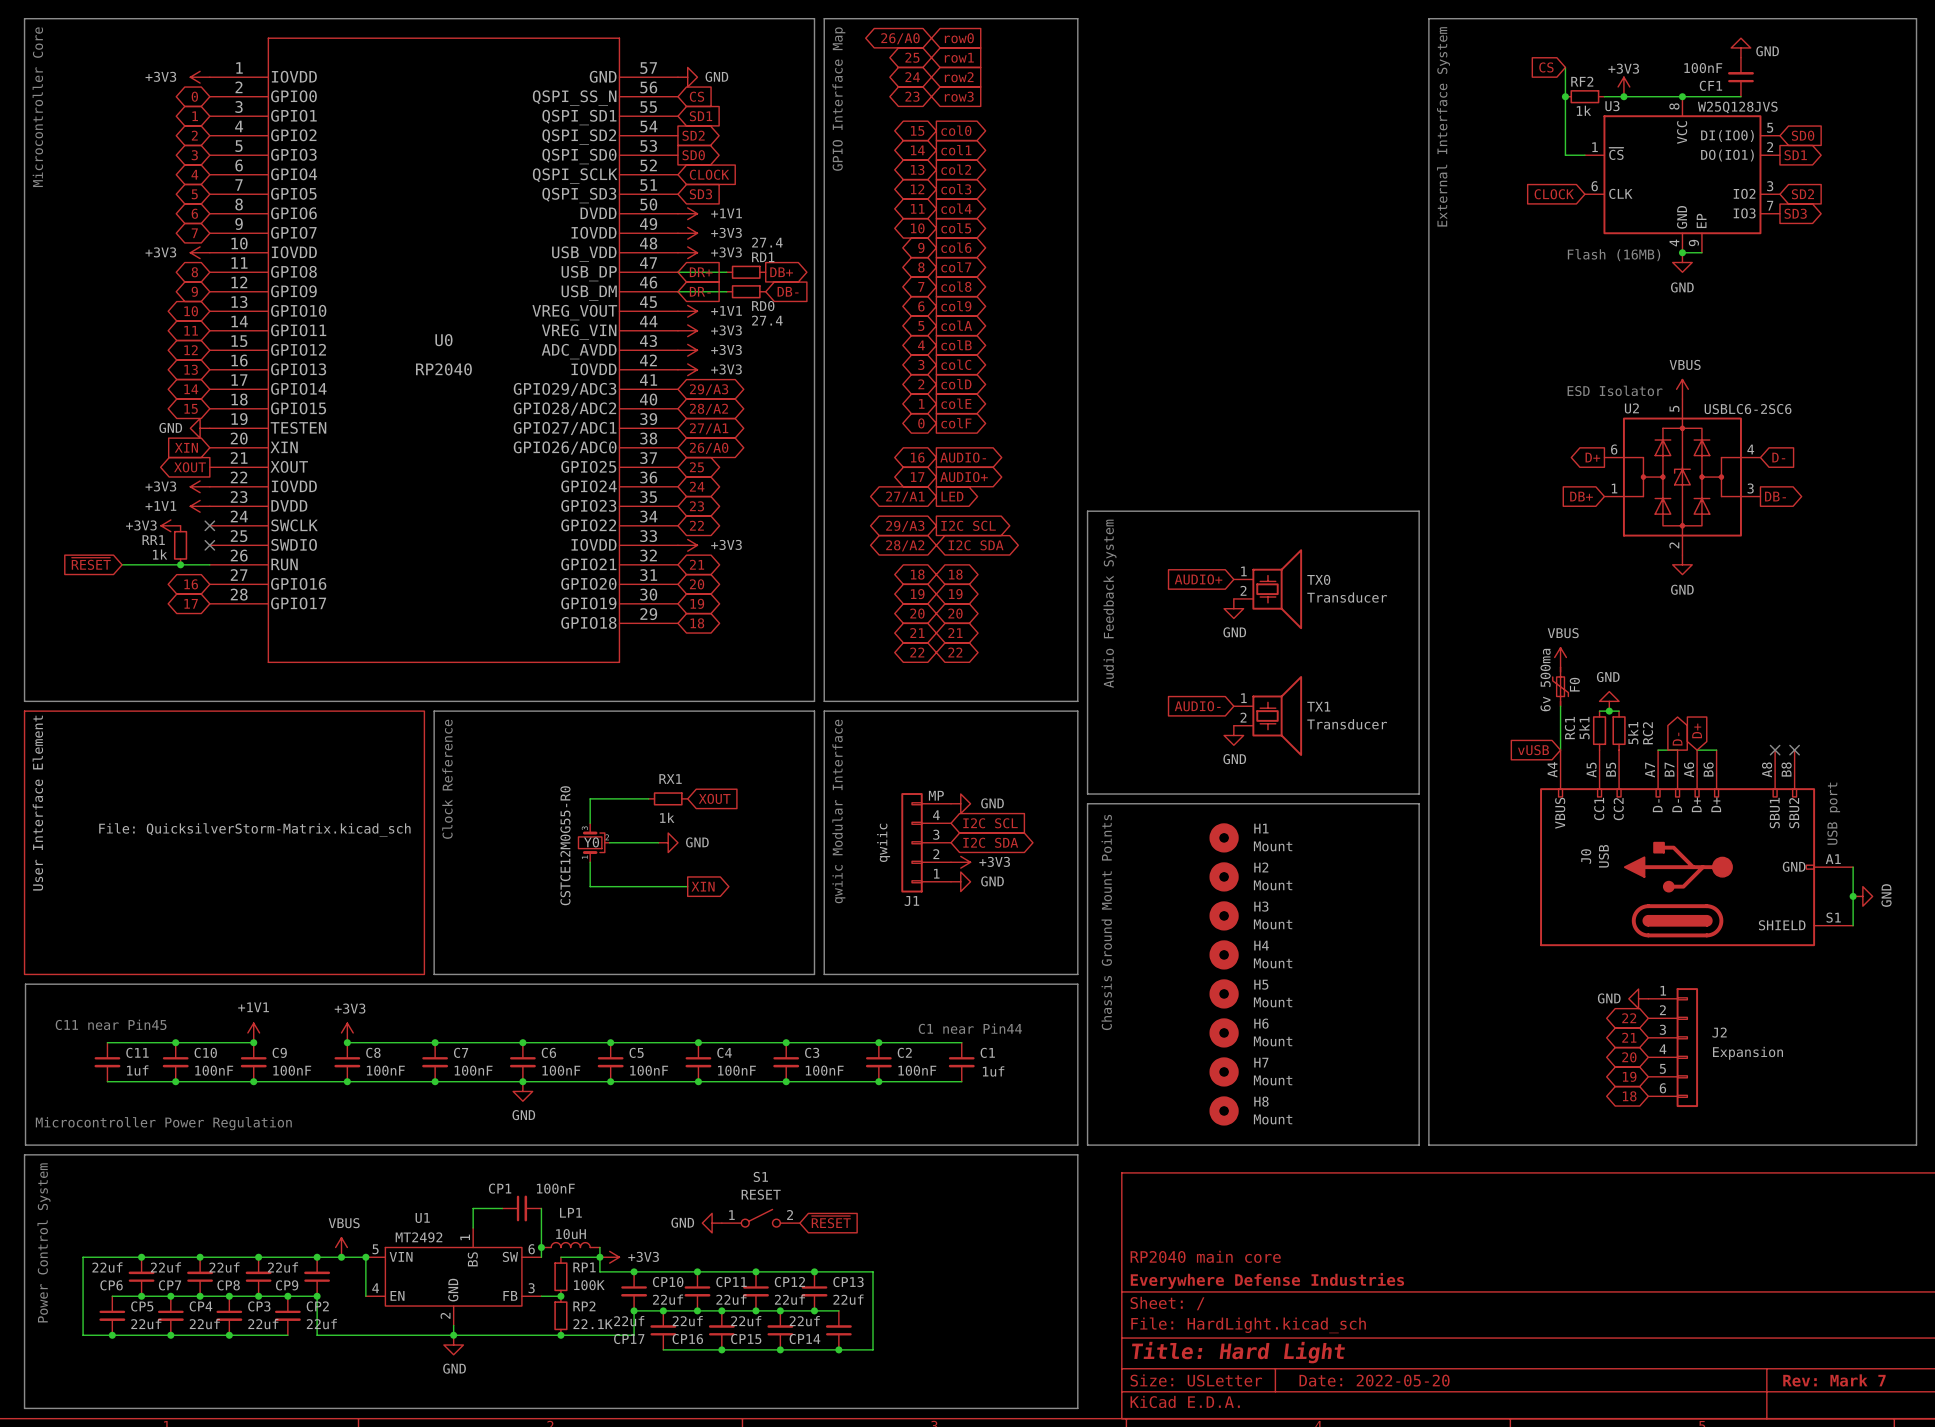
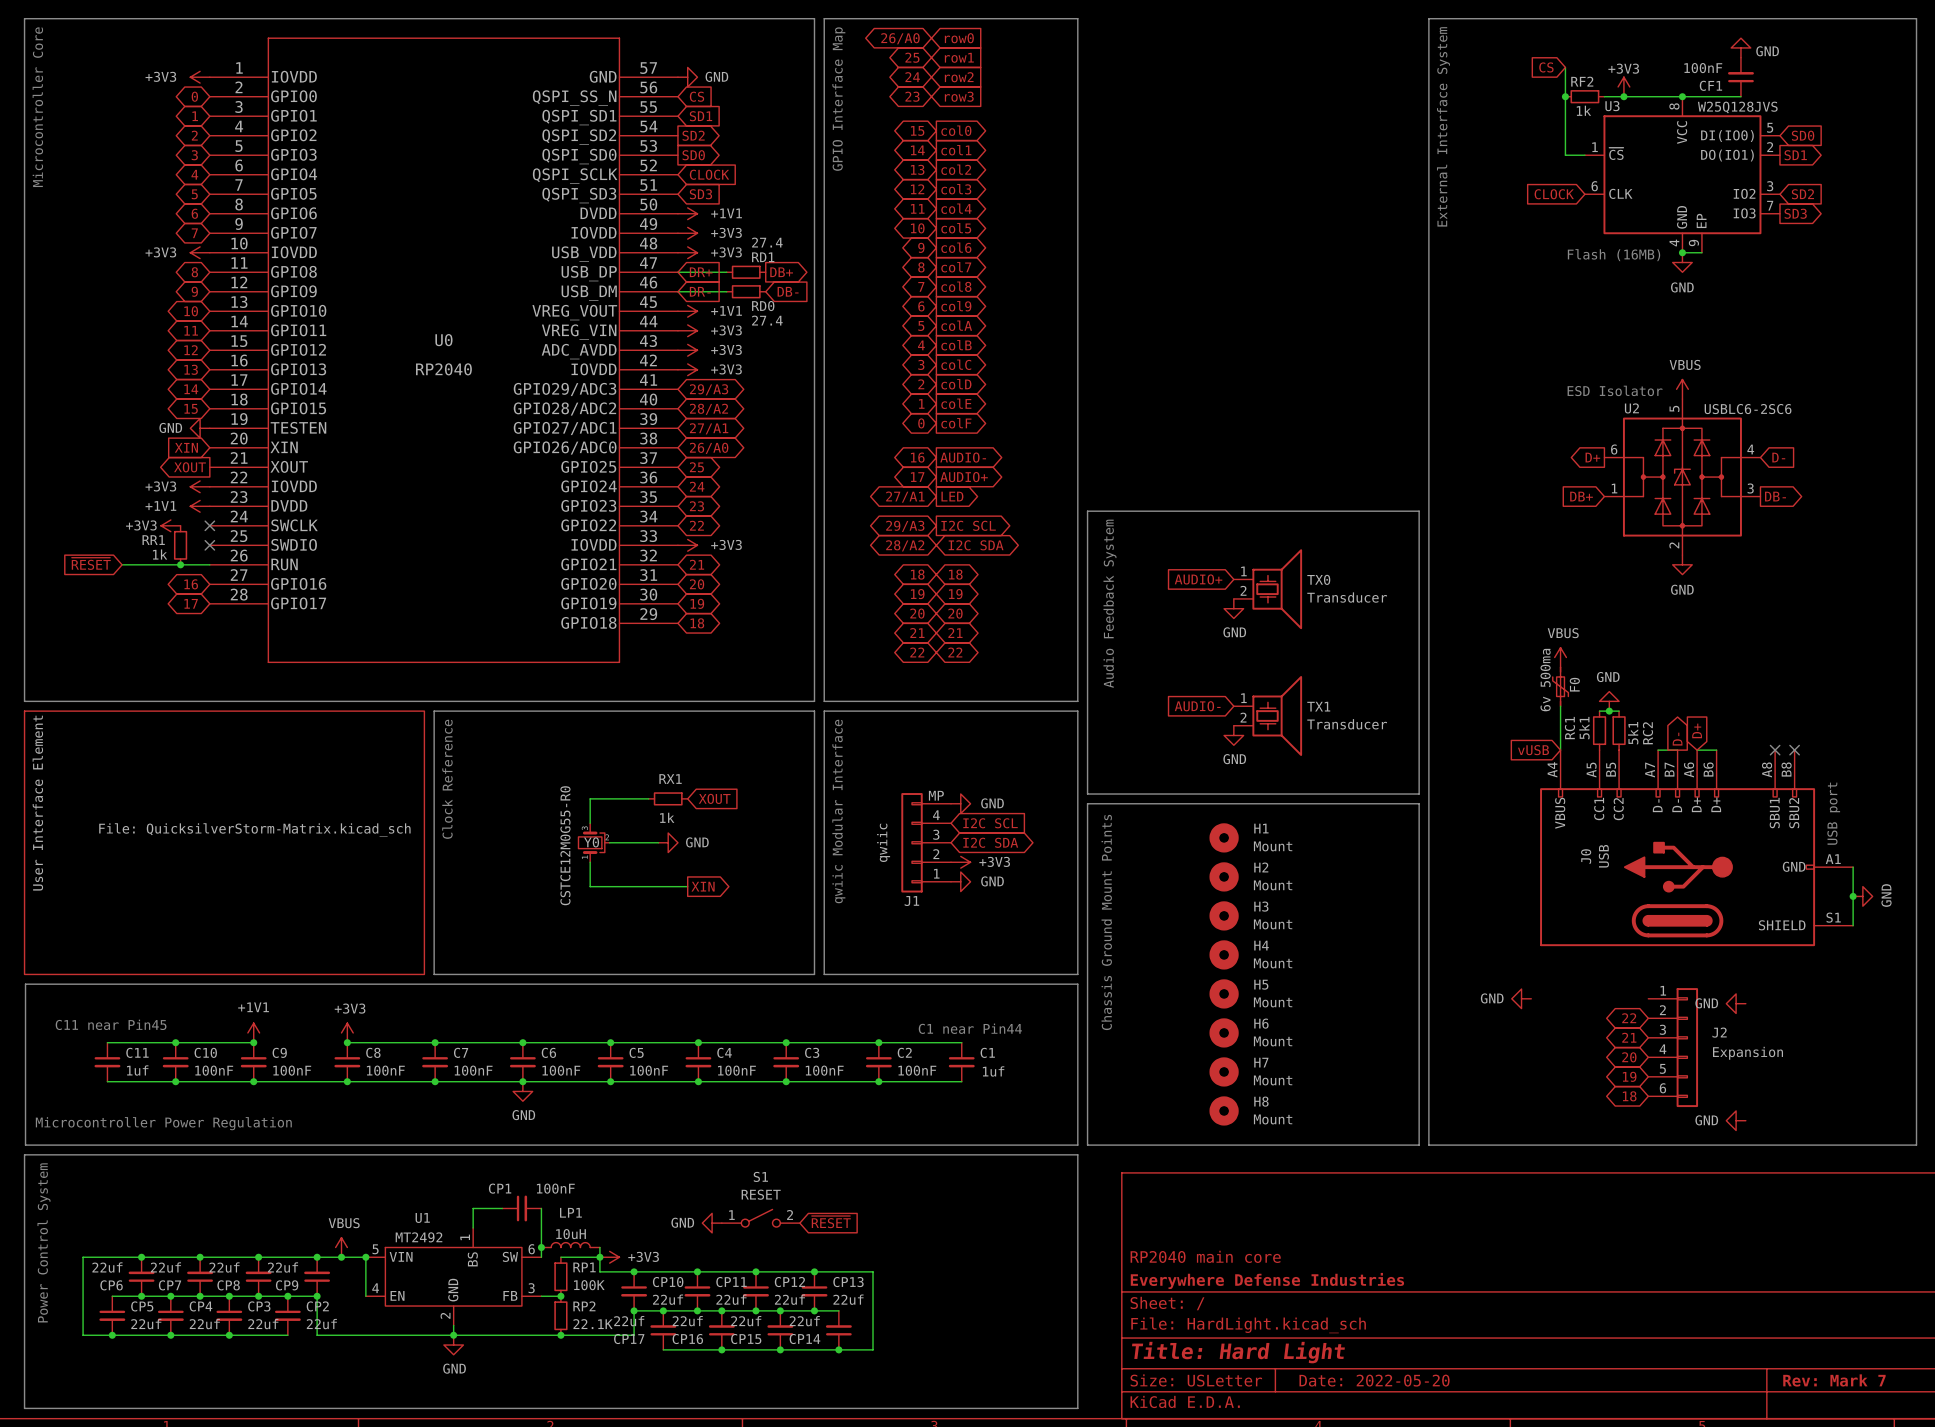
power symbol: none -> GND (1521, 998)
power symbol: GND (1638, 998) -> none
power symbol: none -> GND (1736, 1003)
power symbol: none -> GND (1736, 1120)

